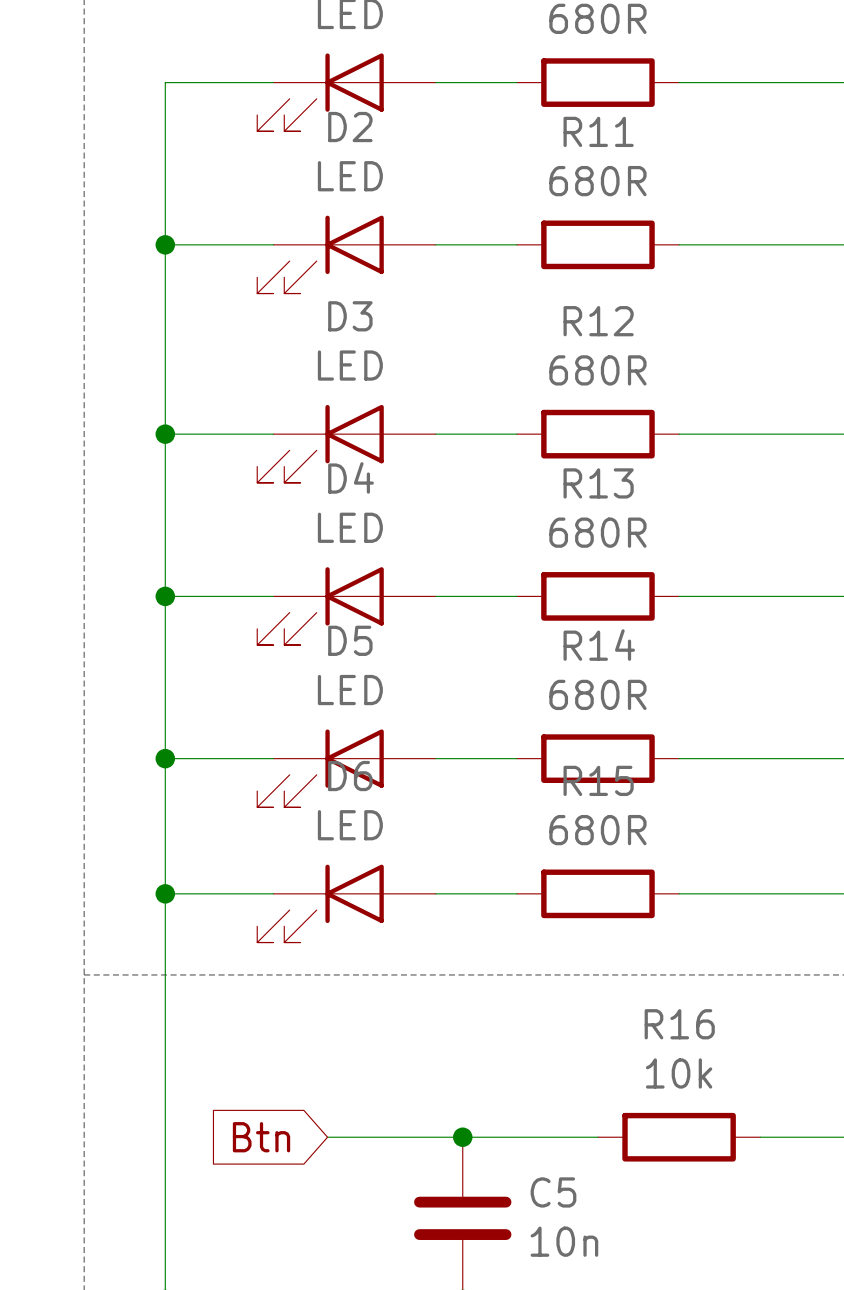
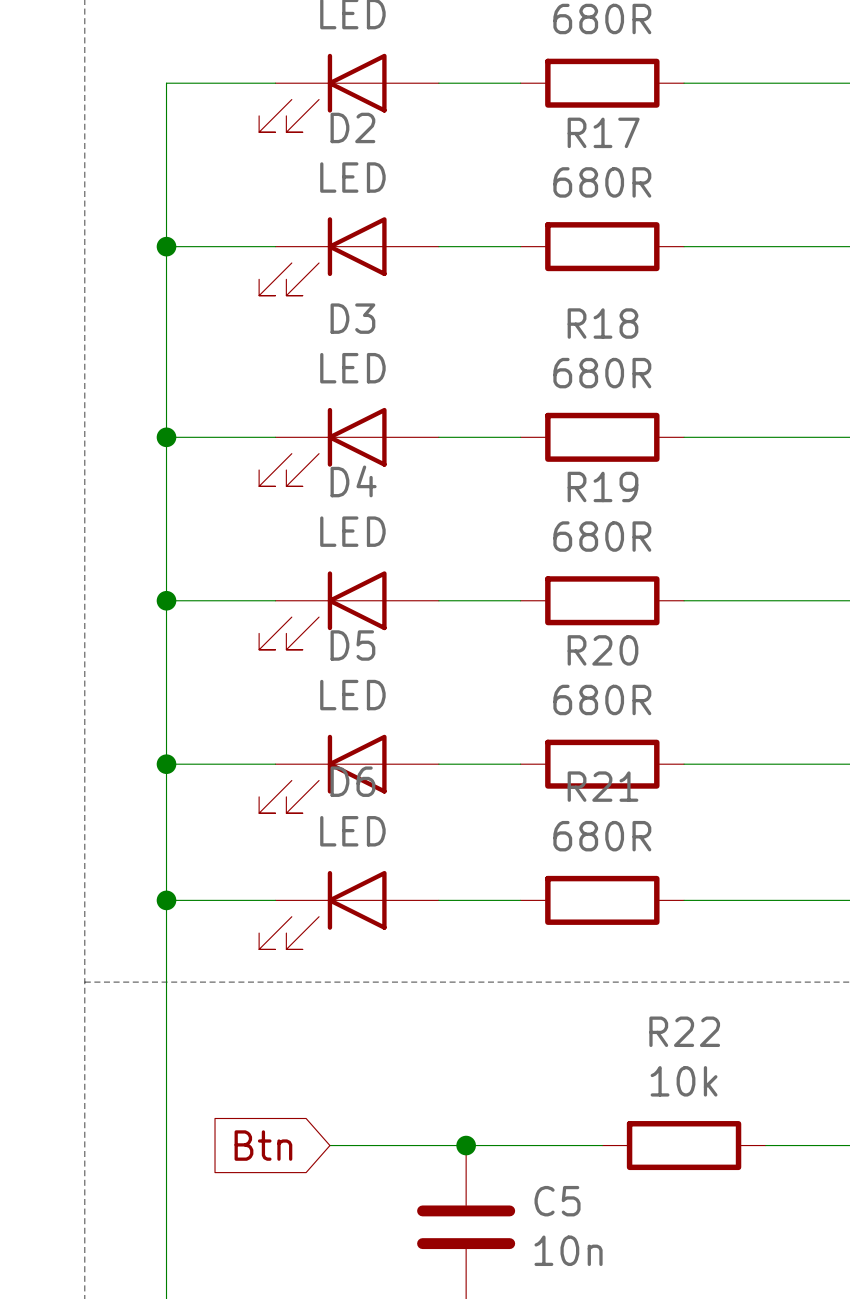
R11 name: R11 (598, 131) -> R17 (603, 132)
R12 name: R12 (598, 321) -> R18 (602, 323)
R13 name: R13 (598, 483) -> R19 (602, 486)
R14 name: R14 (599, 645) -> R20 (602, 650)
R15 name: R15 (598, 780) -> R21 (602, 786)
R16 name: R16 (679, 1024) -> R22 (684, 1031)

